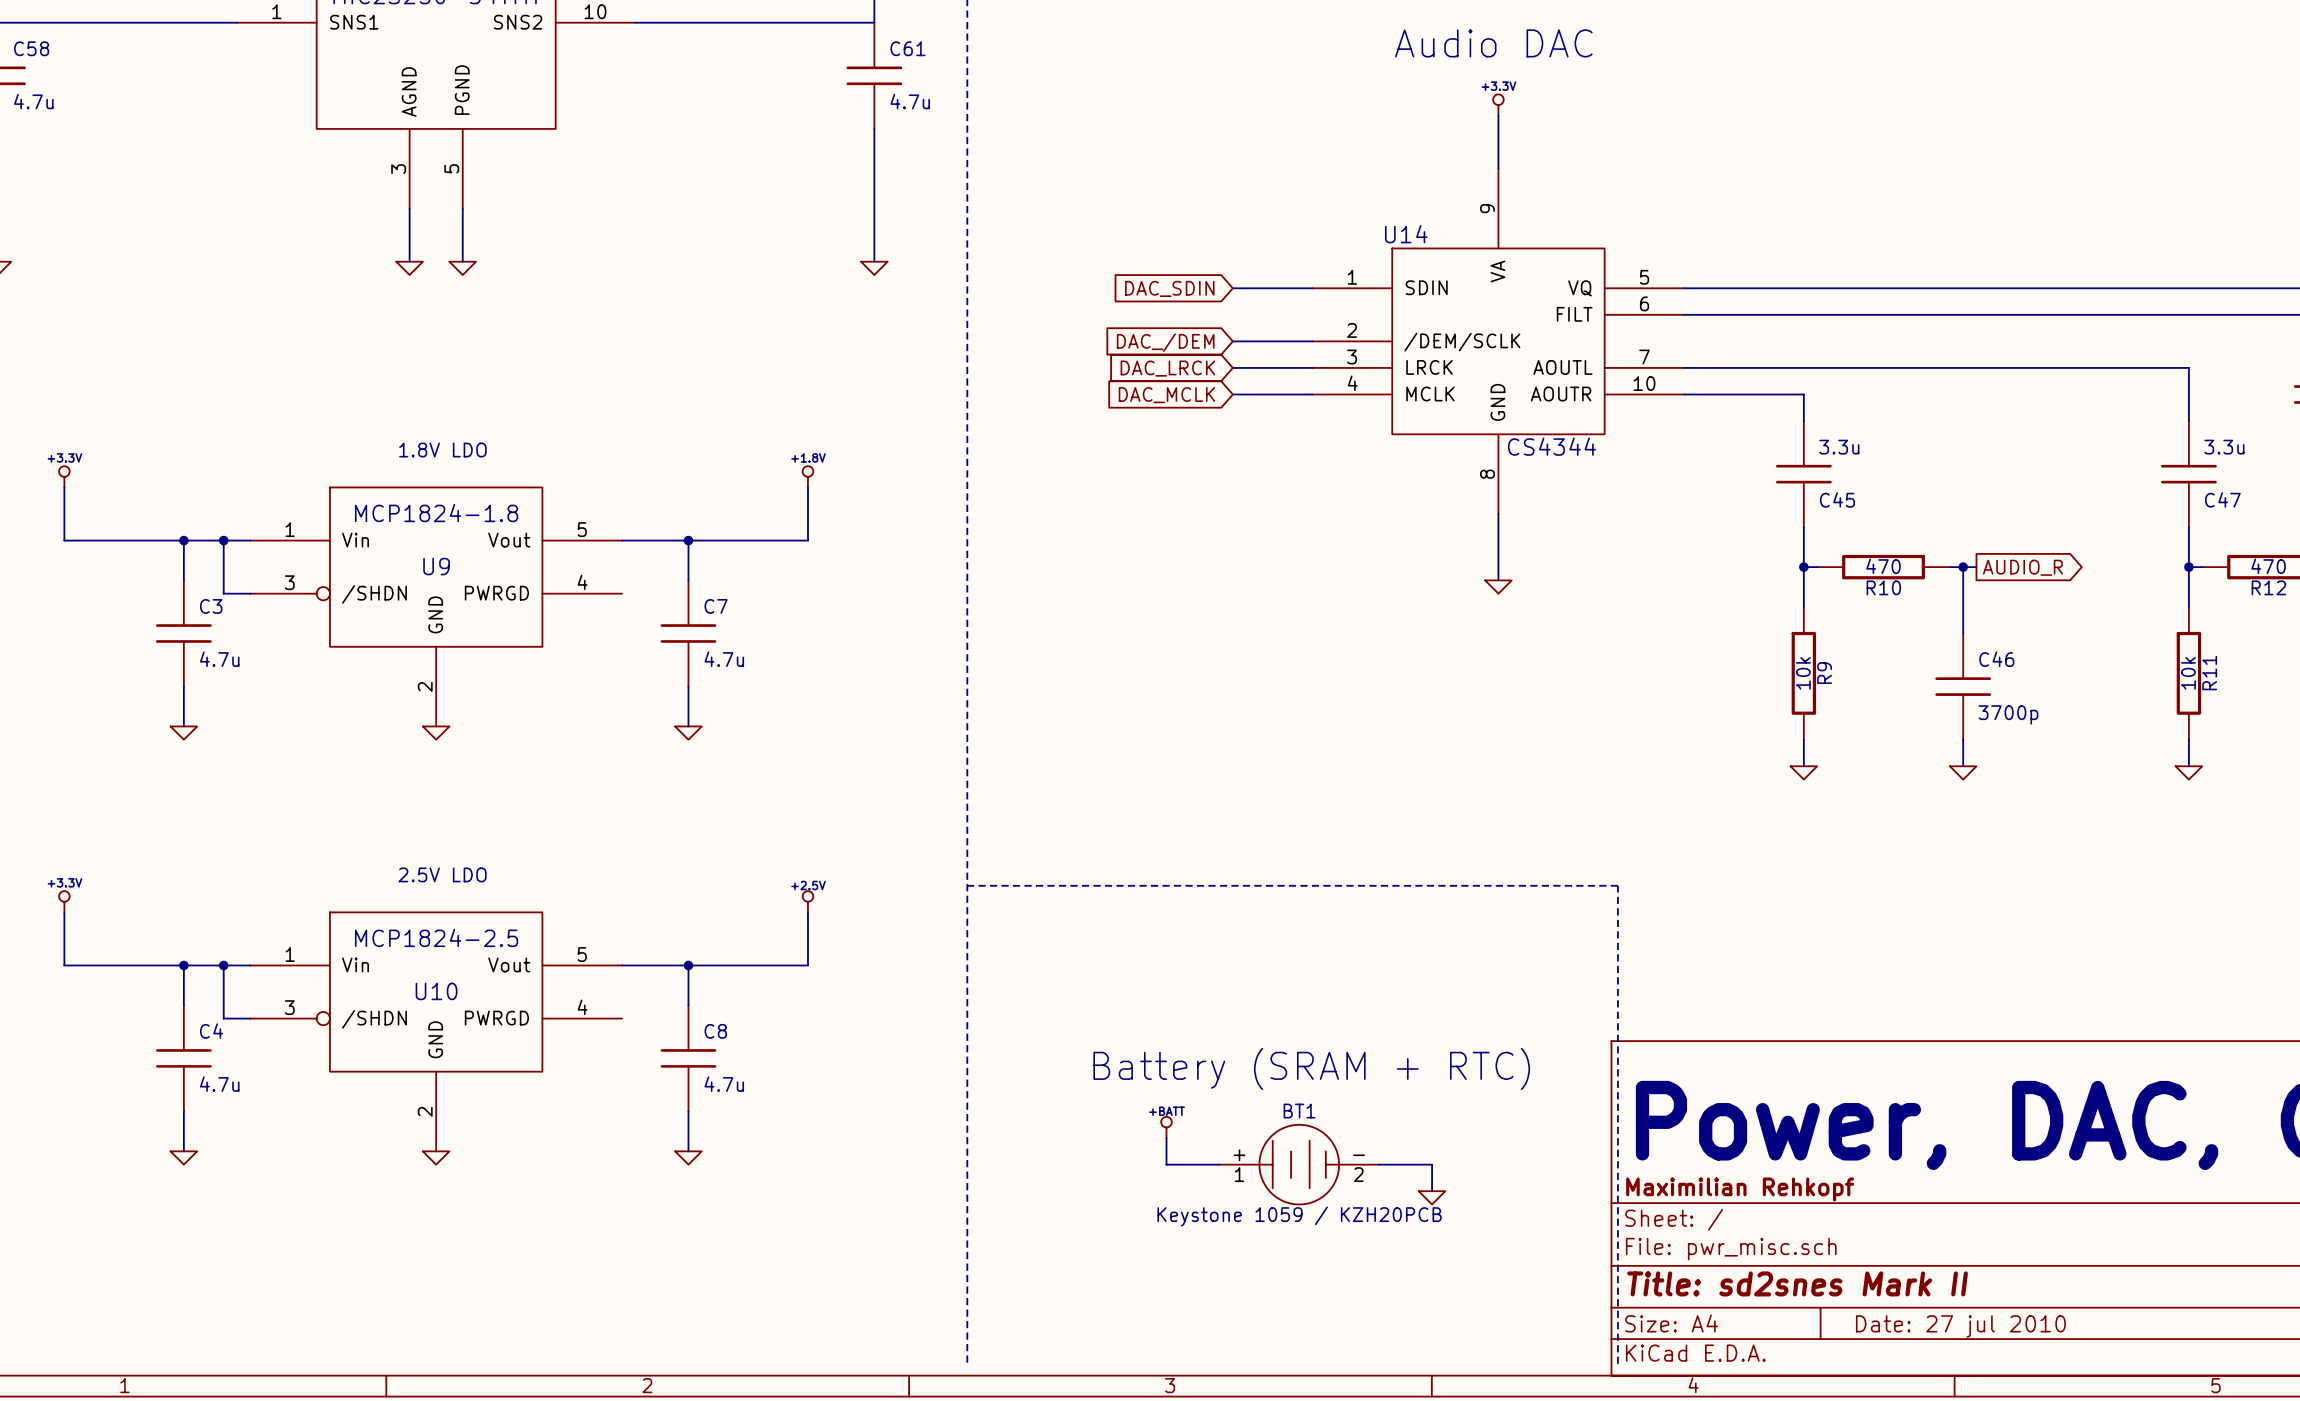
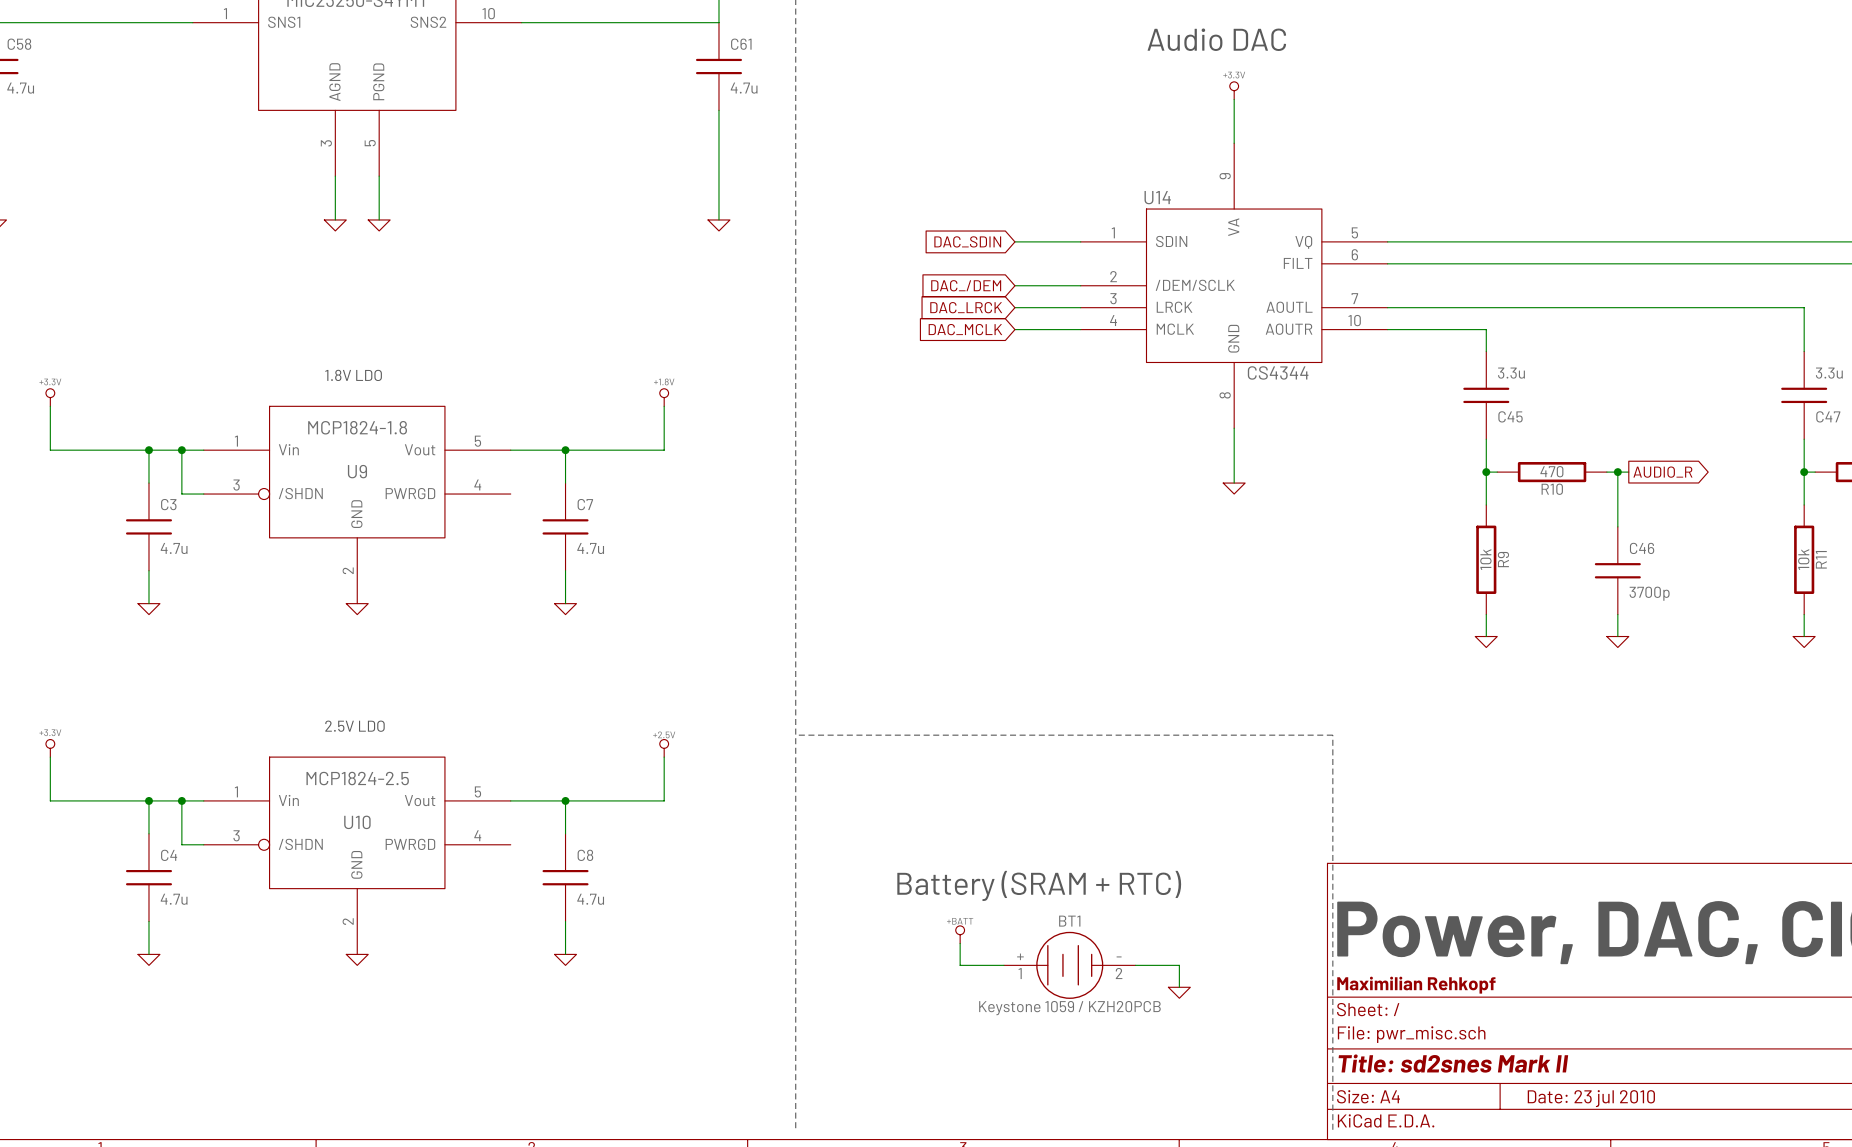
title block: Date: 27 jul 2010 (1960, 1326) -> Date: 23 jul 2010 (1591, 1098)

